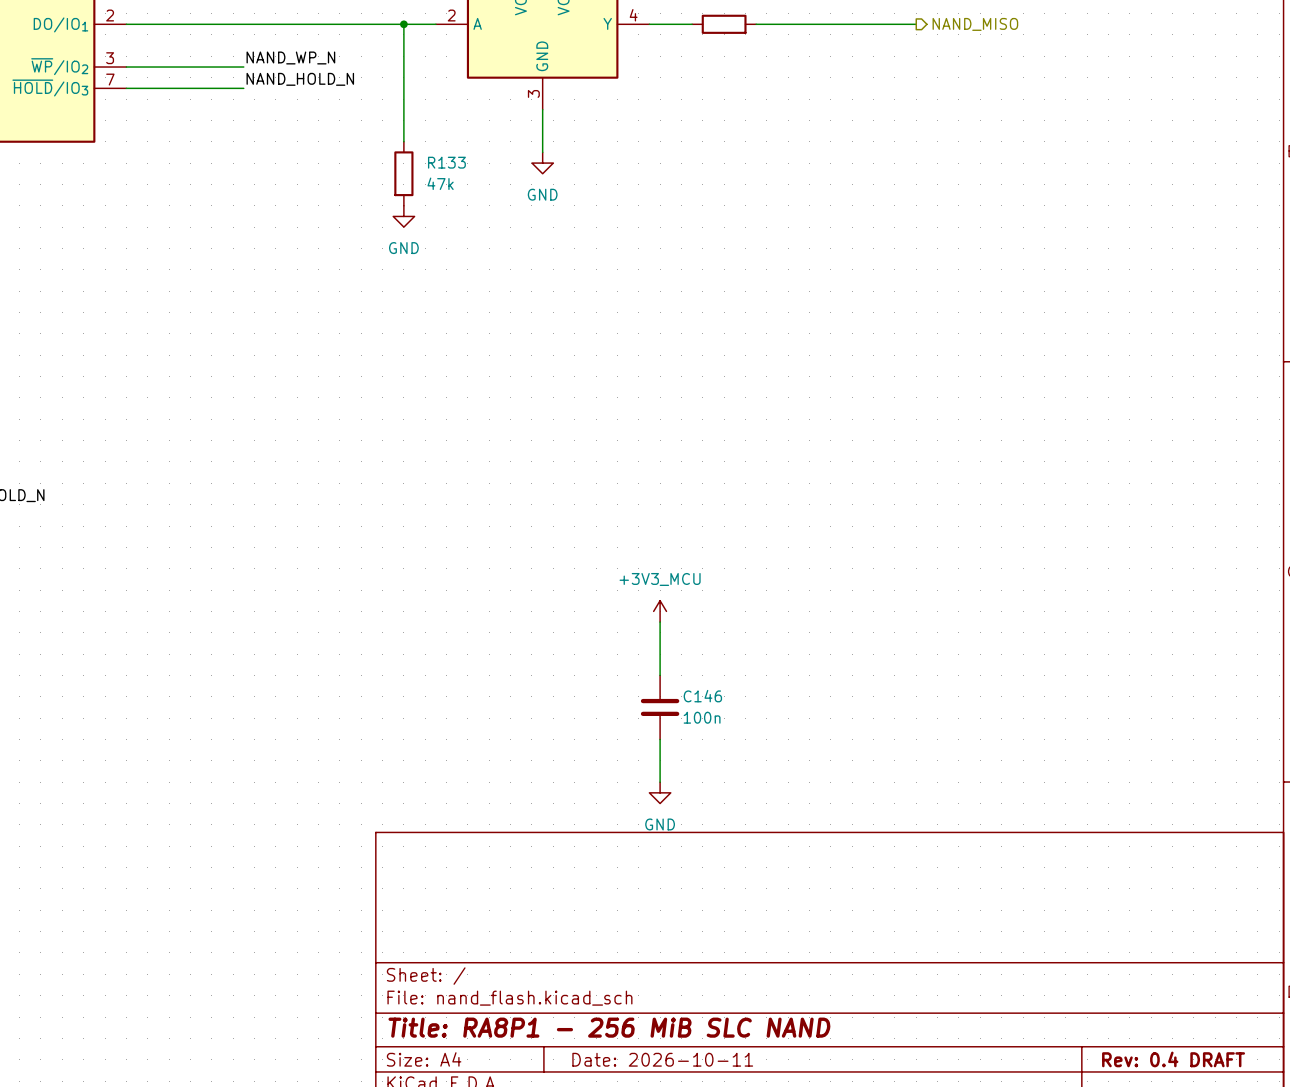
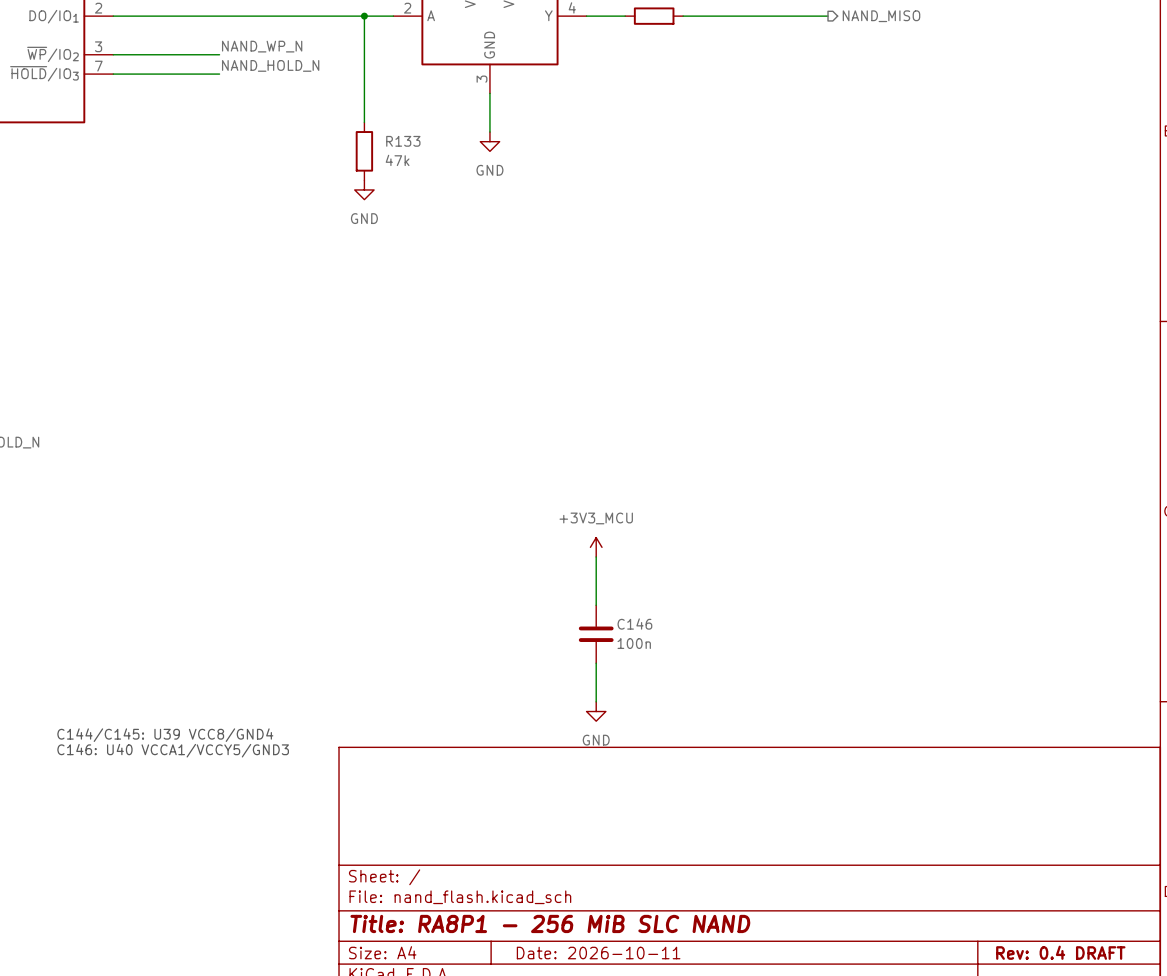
text: none -> C144/C145: U39 VCC8/GND4 (165, 735)
text: none -> C146: U40 VCCA1/VCCY5/GND3 (173, 750)

